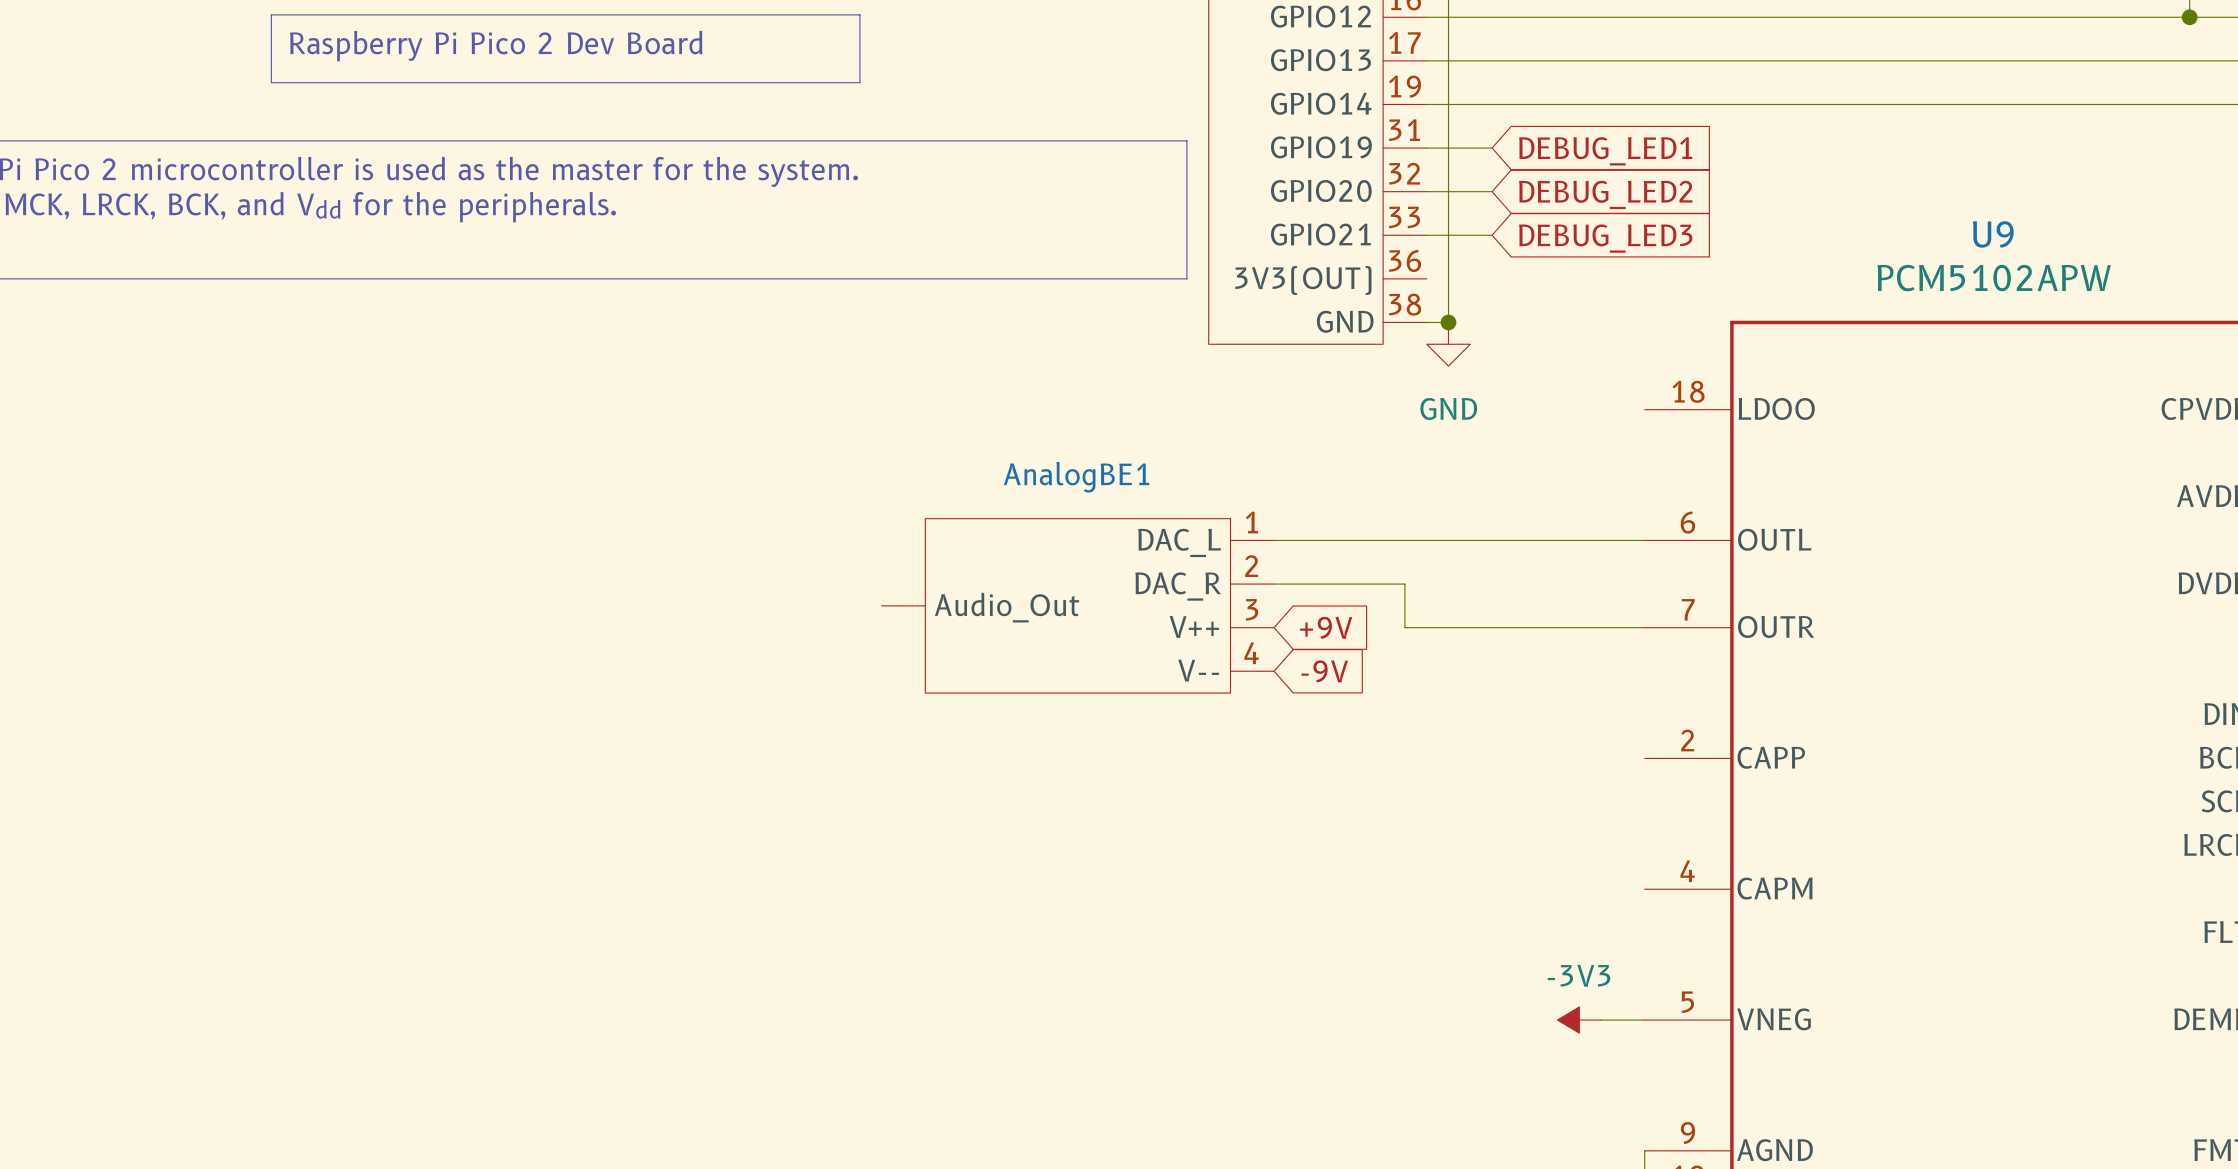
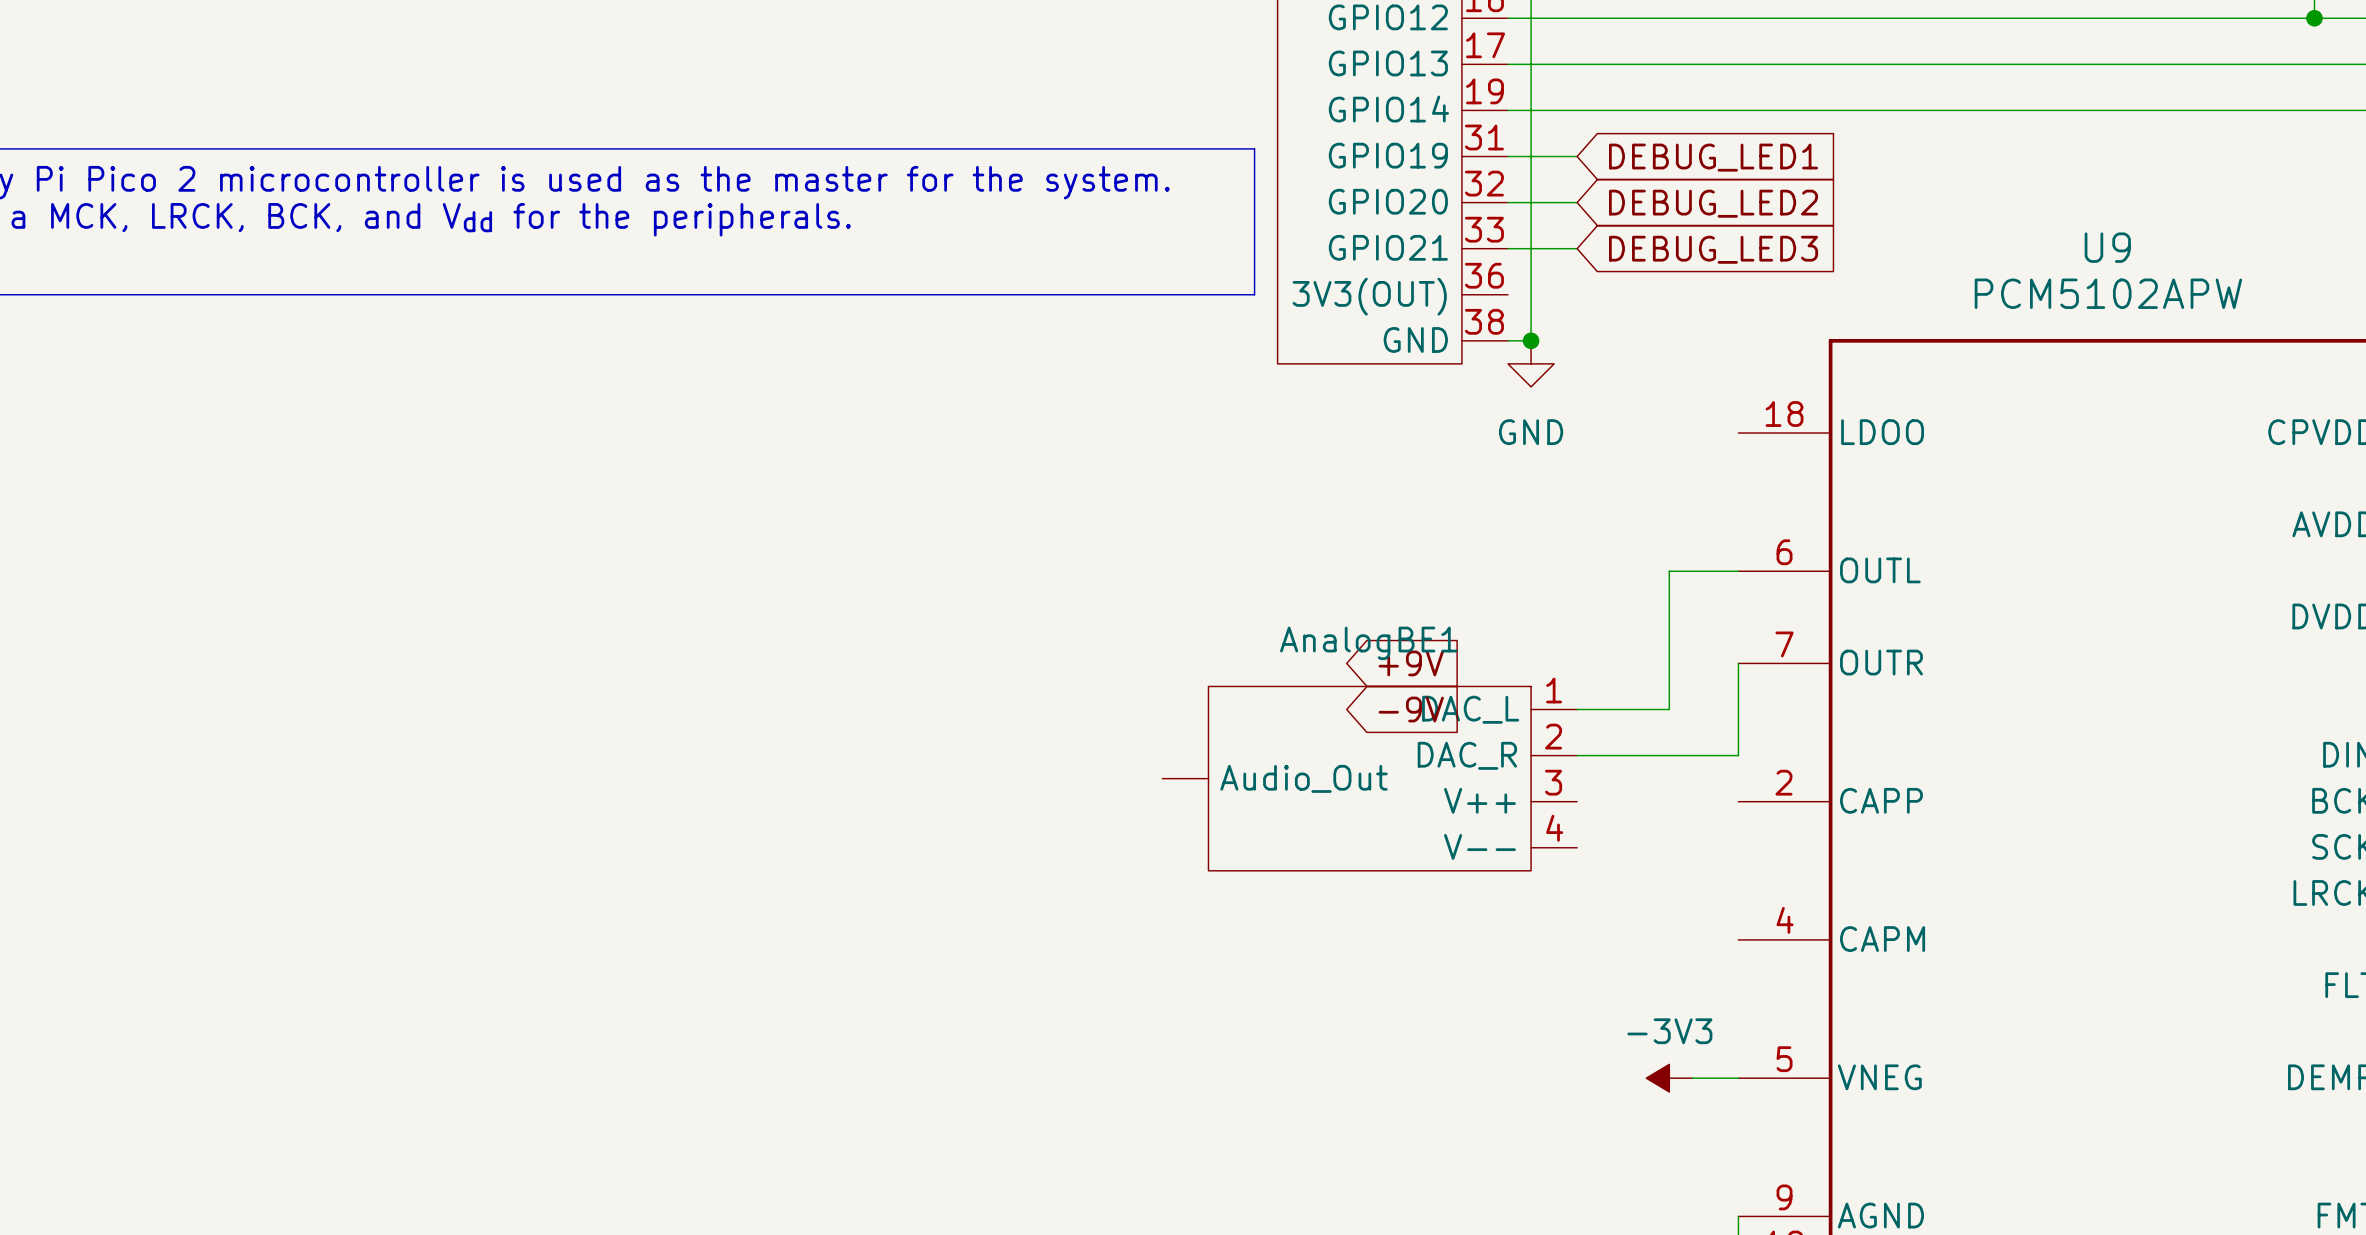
line: (271, 14) (859, 14) (859, 82) (271, 82) (271, 14) -> none
text: Raspberry Pi Pico 2 Dev Board (496, 46) -> none
wire: (1274, 540) (1579, 540) -> (1577, 709) (1669, 709) (1669, 571)
wire: (1274, 584) (1404, 584) (1404, 627) (1644, 627) -> (1577, 755) (1738, 755) (1738, 663)
AnalogBE1 position: (1077, 605) -> (1369, 778)

